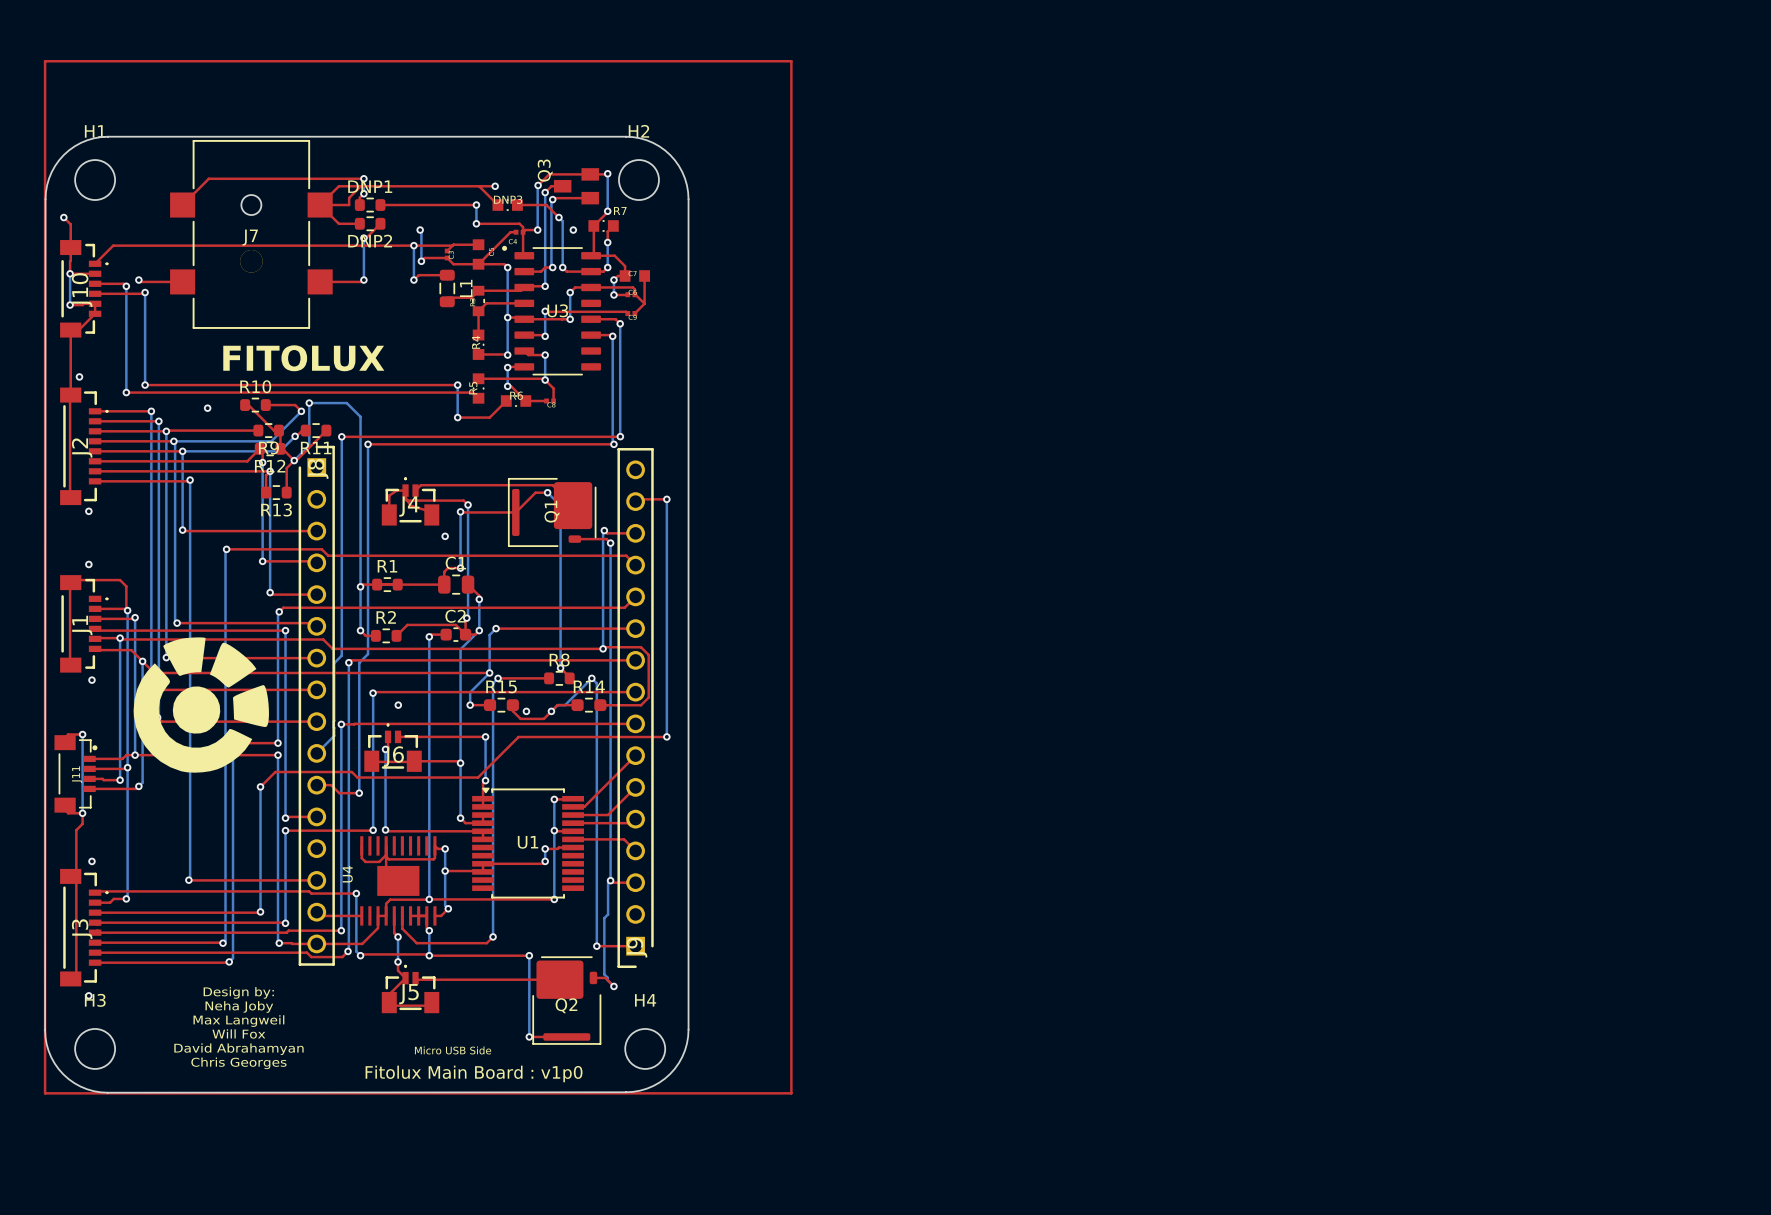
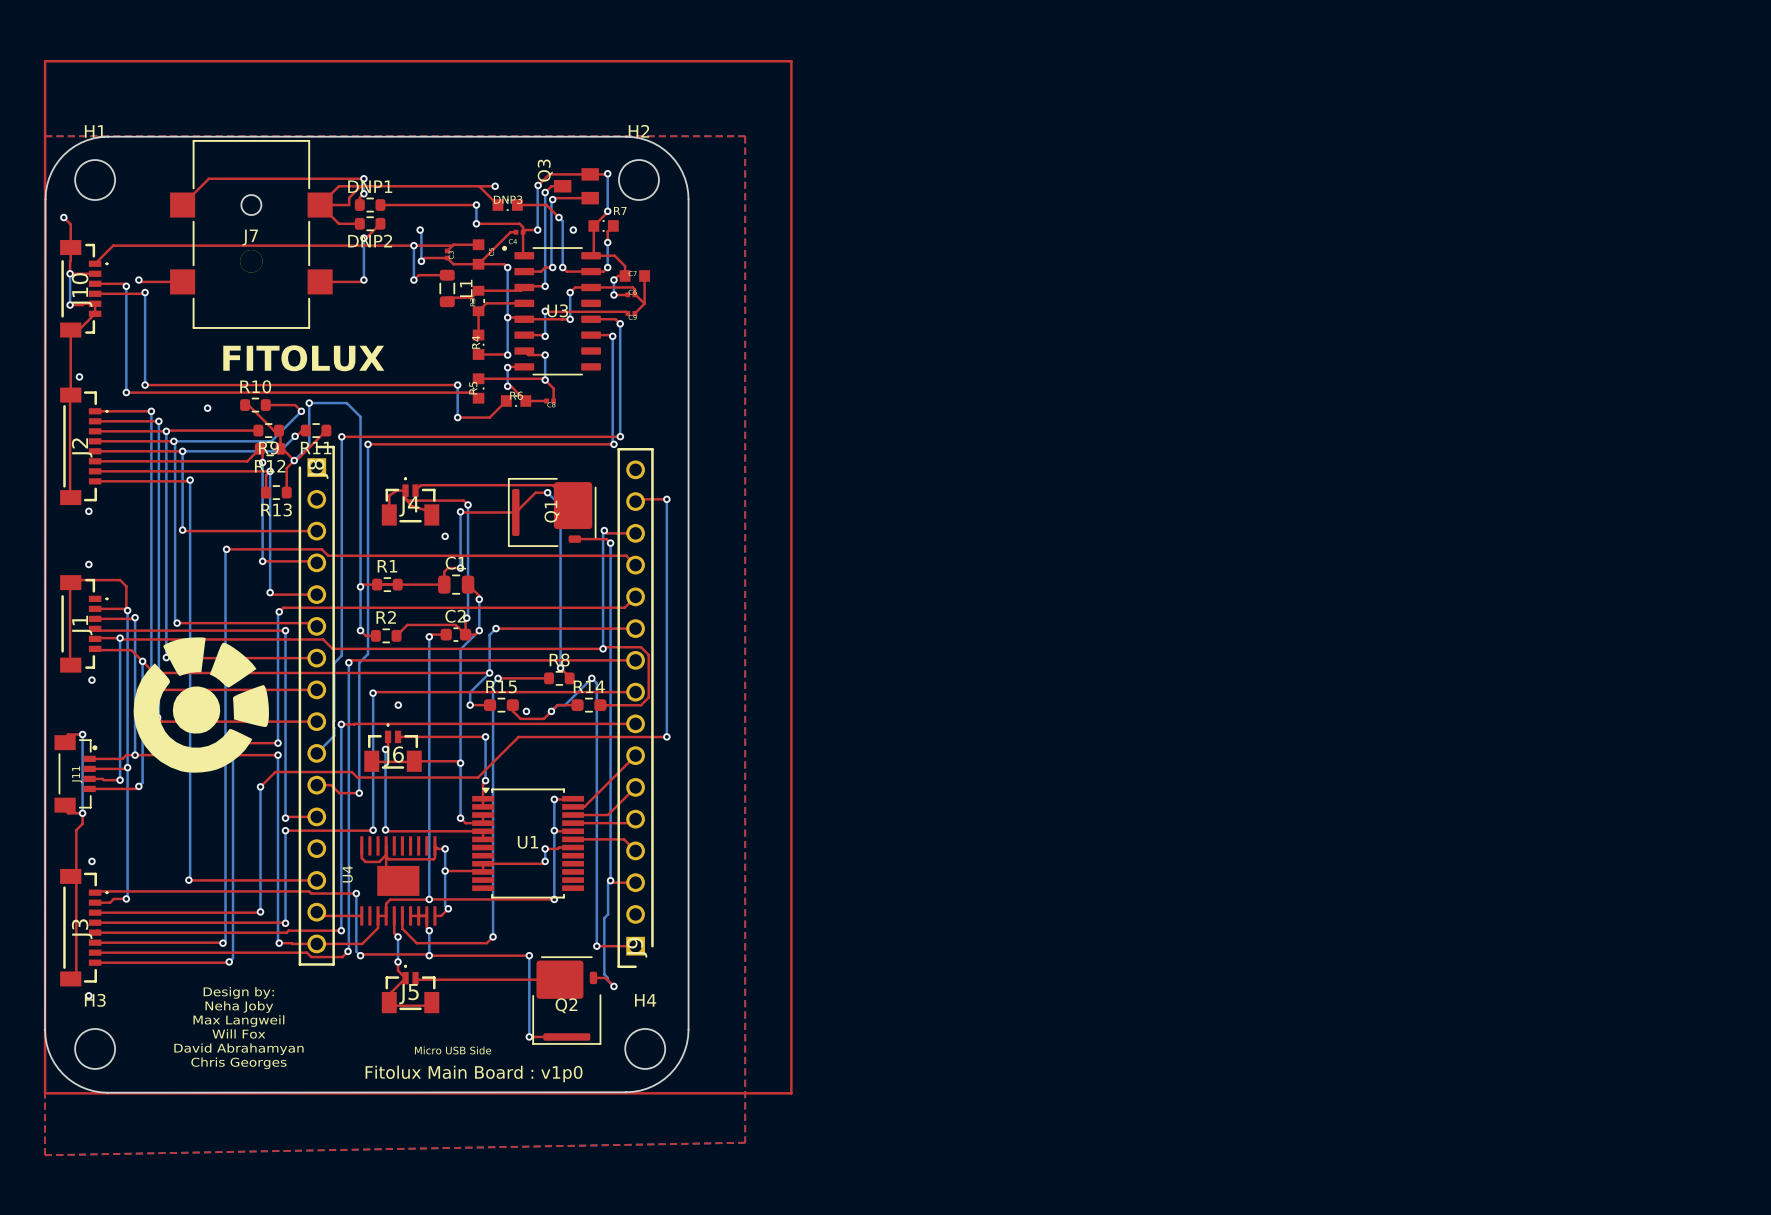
top zone outline: none -> (45, 136) (745, 136) (745, 1142) (45, 1155) (45, 136)

